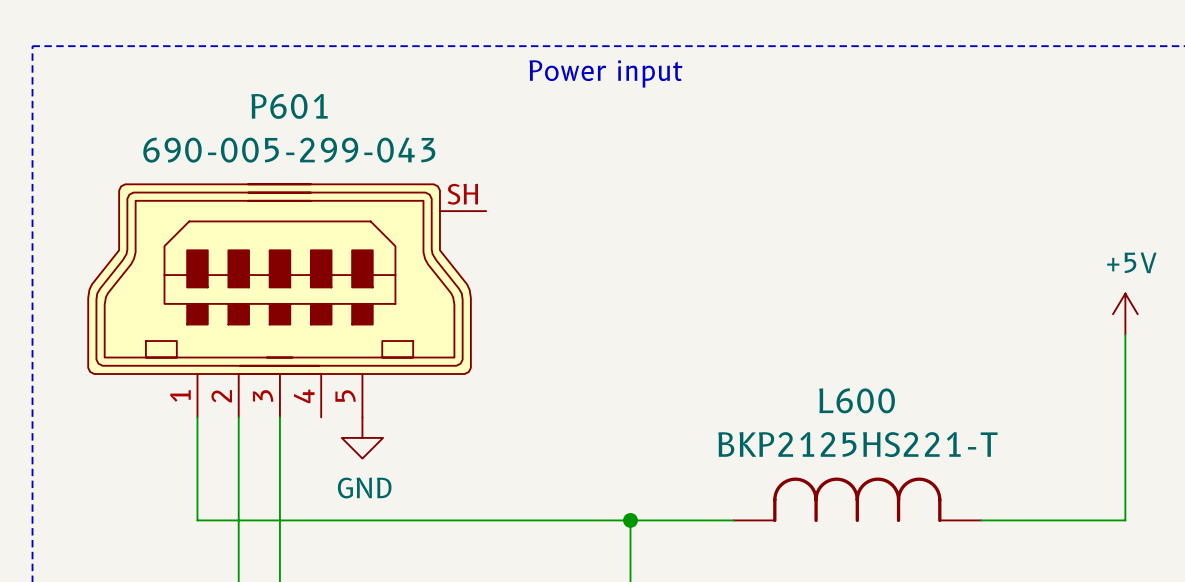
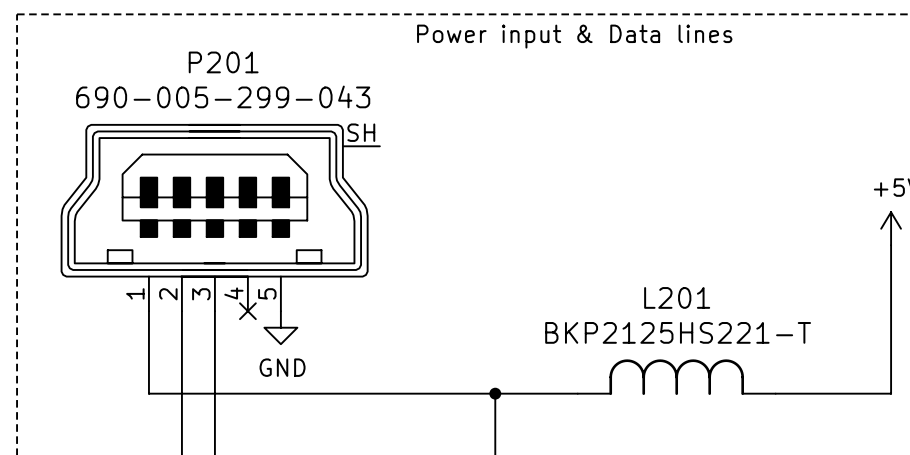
text: Power input (605, 73) -> Power input & Data lines (574, 36)
P601 name: P601 (289, 106) -> P201 (223, 62)
L600 name: L600 (857, 400) -> L201 (677, 297)
no-connect mark: none -> (247, 311)

